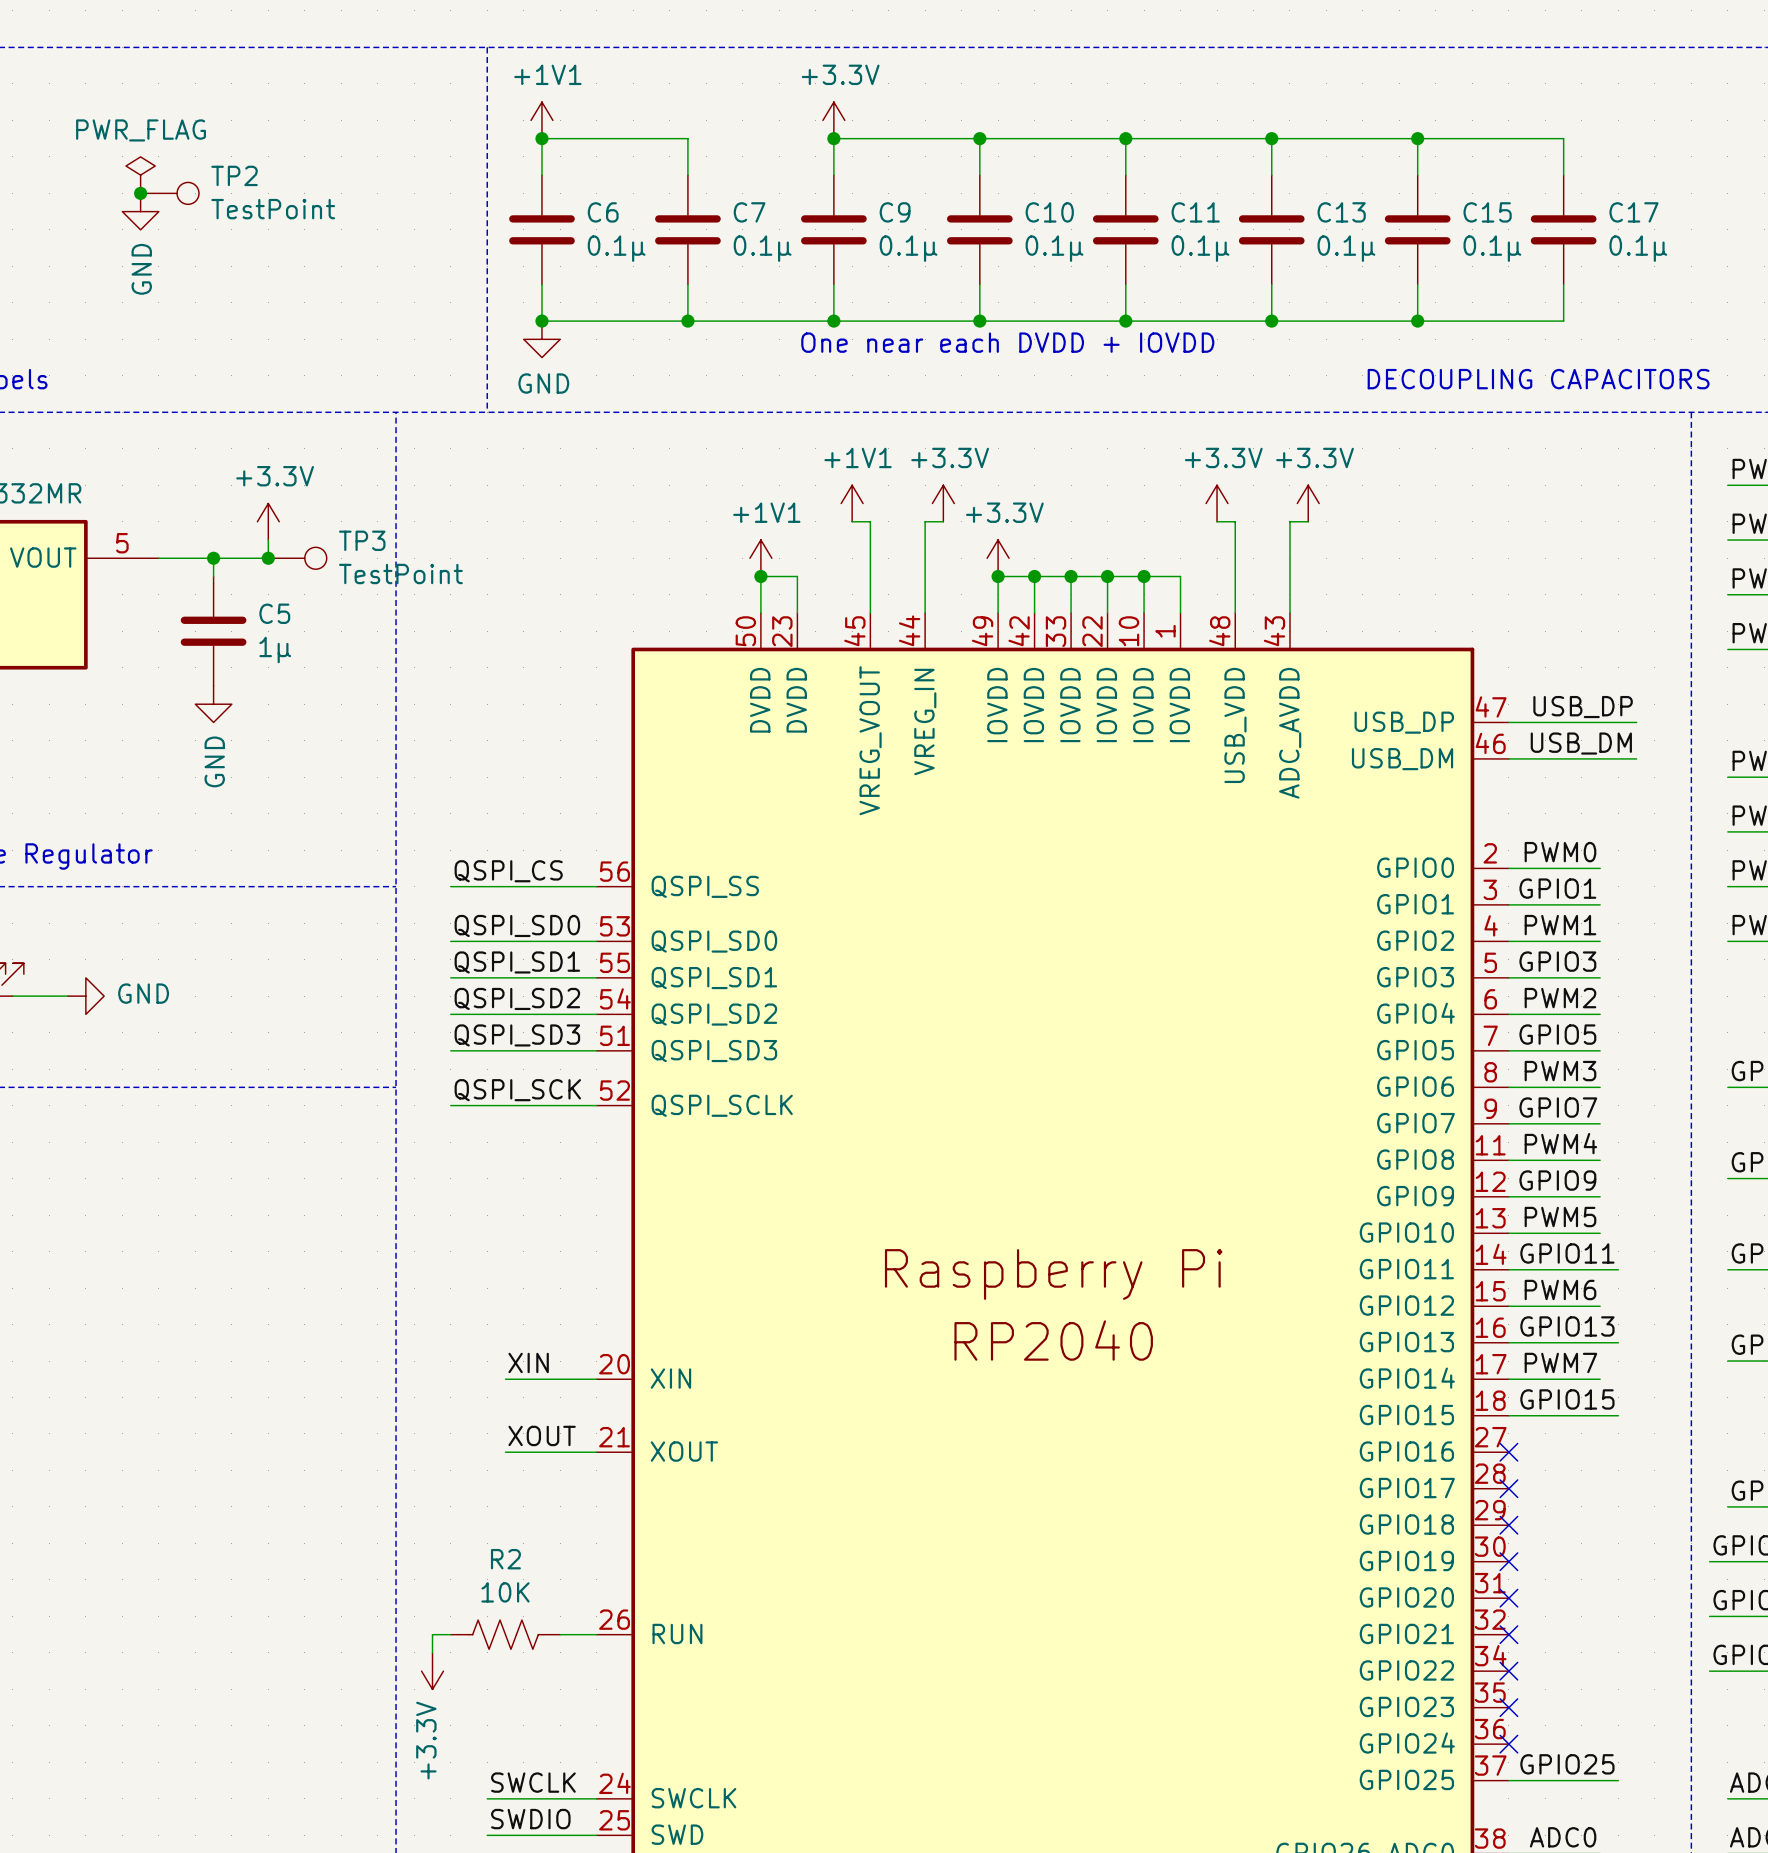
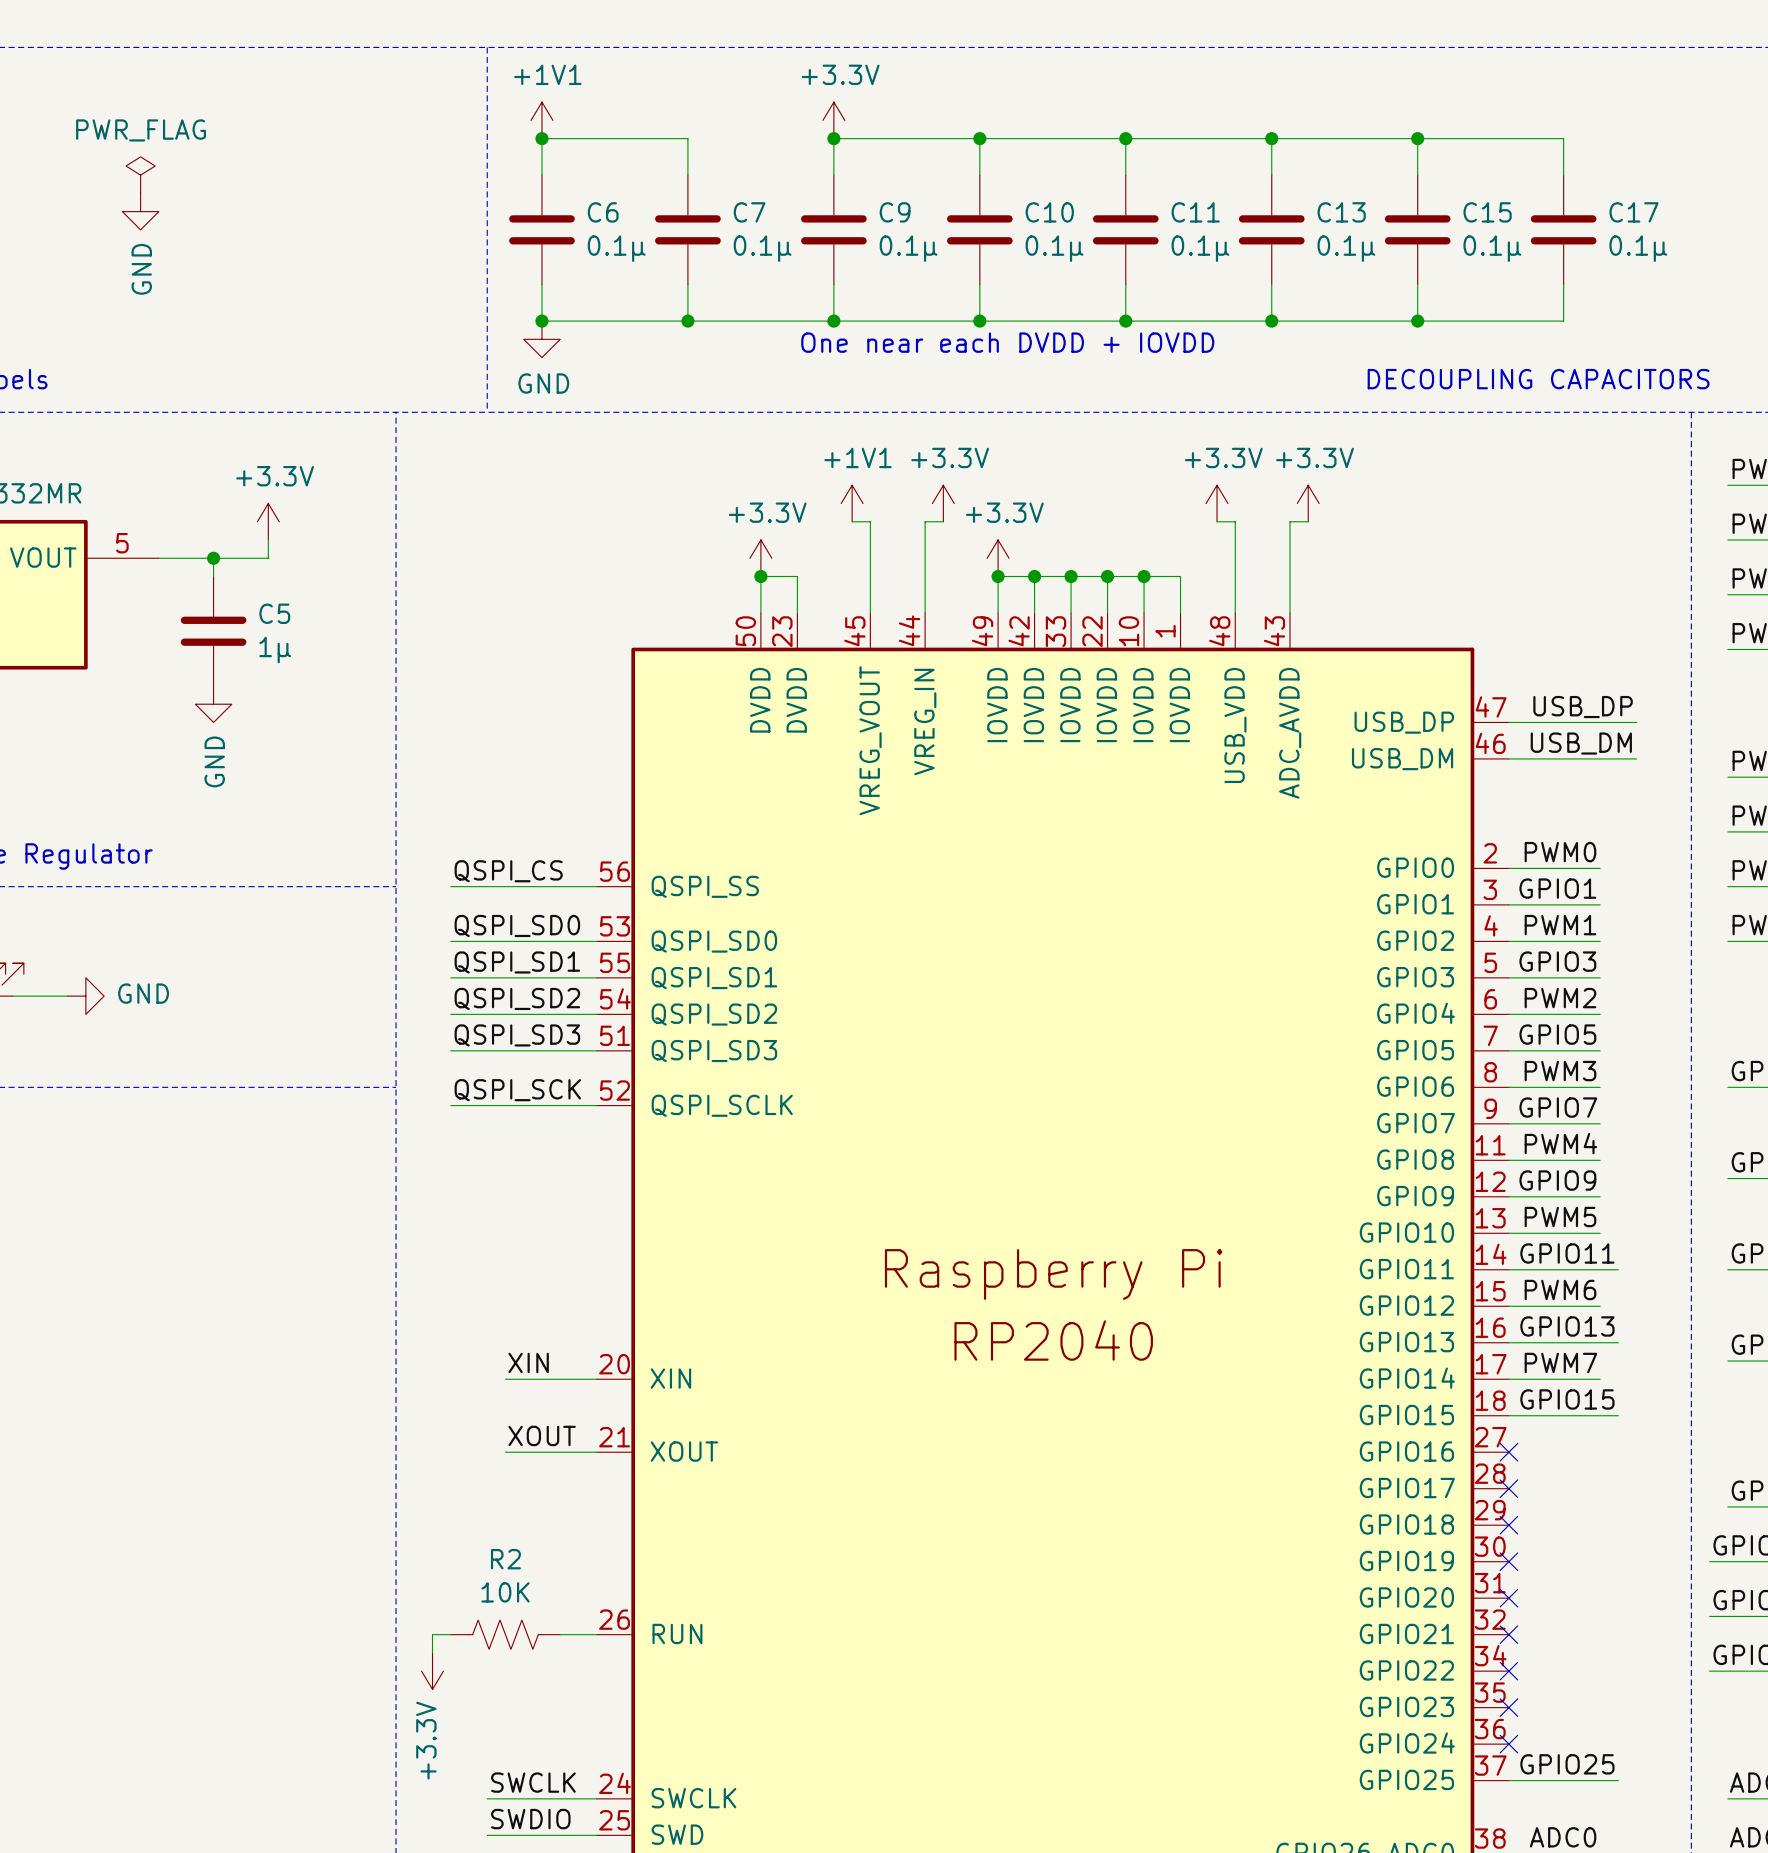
junction: (140, 193) -> none
TP2: TestPoint (169, 193) -> none
junction: (268, 558) -> none
TP3: TestPoint (297, 558) -> none
power symbol: +1V1 (760, 558) -> +3.3V (760, 558)

